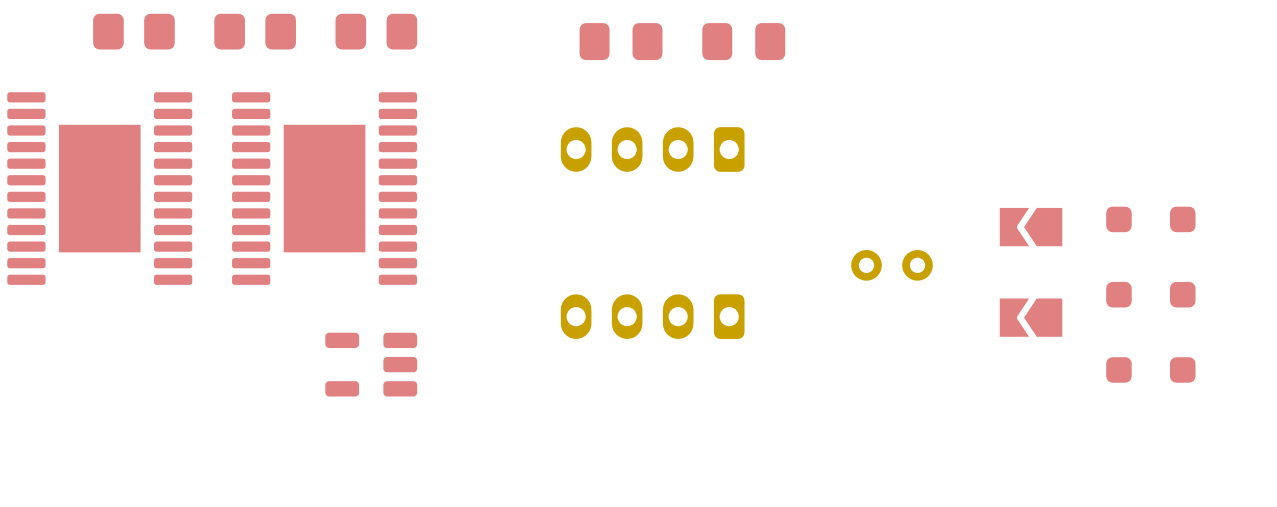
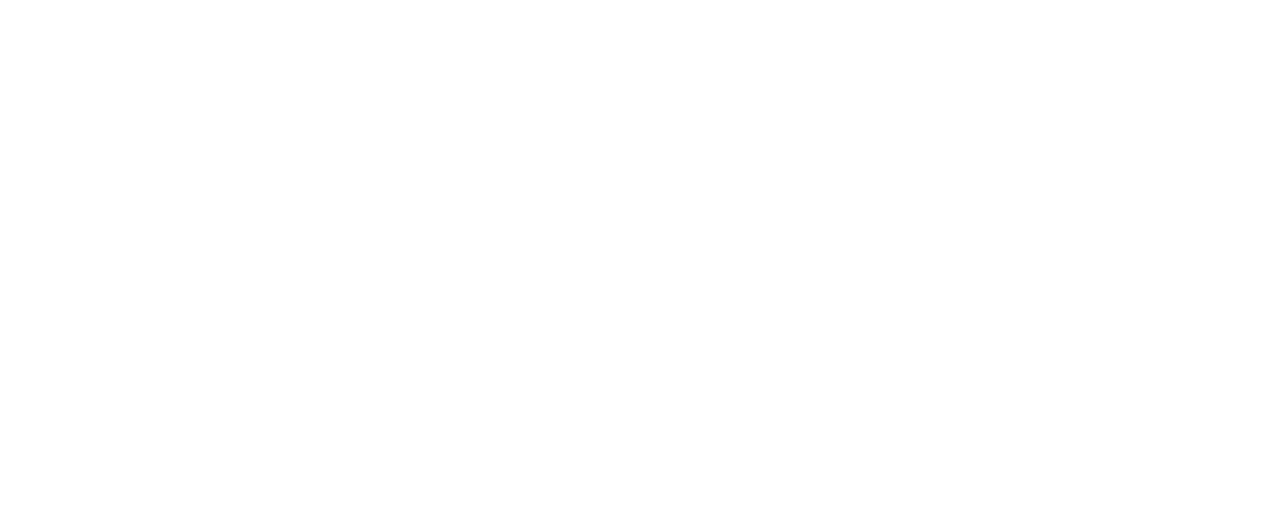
part: (133, 31) -> none
part: (255, 31) -> none
part: (376, 31) -> none
part: (621, 41) -> none
part: (743, 41) -> none
part: (652, 149) -> none
part: (99, 188) -> none
part: (324, 188) -> none
part: (1150, 219) -> none
part: (1031, 227) -> none
part: (892, 265) -> none
part: (1150, 294) -> none
part: (652, 316) -> none
part: (1031, 317) -> none
part: (371, 364) -> none
part: (1150, 369) -> none

